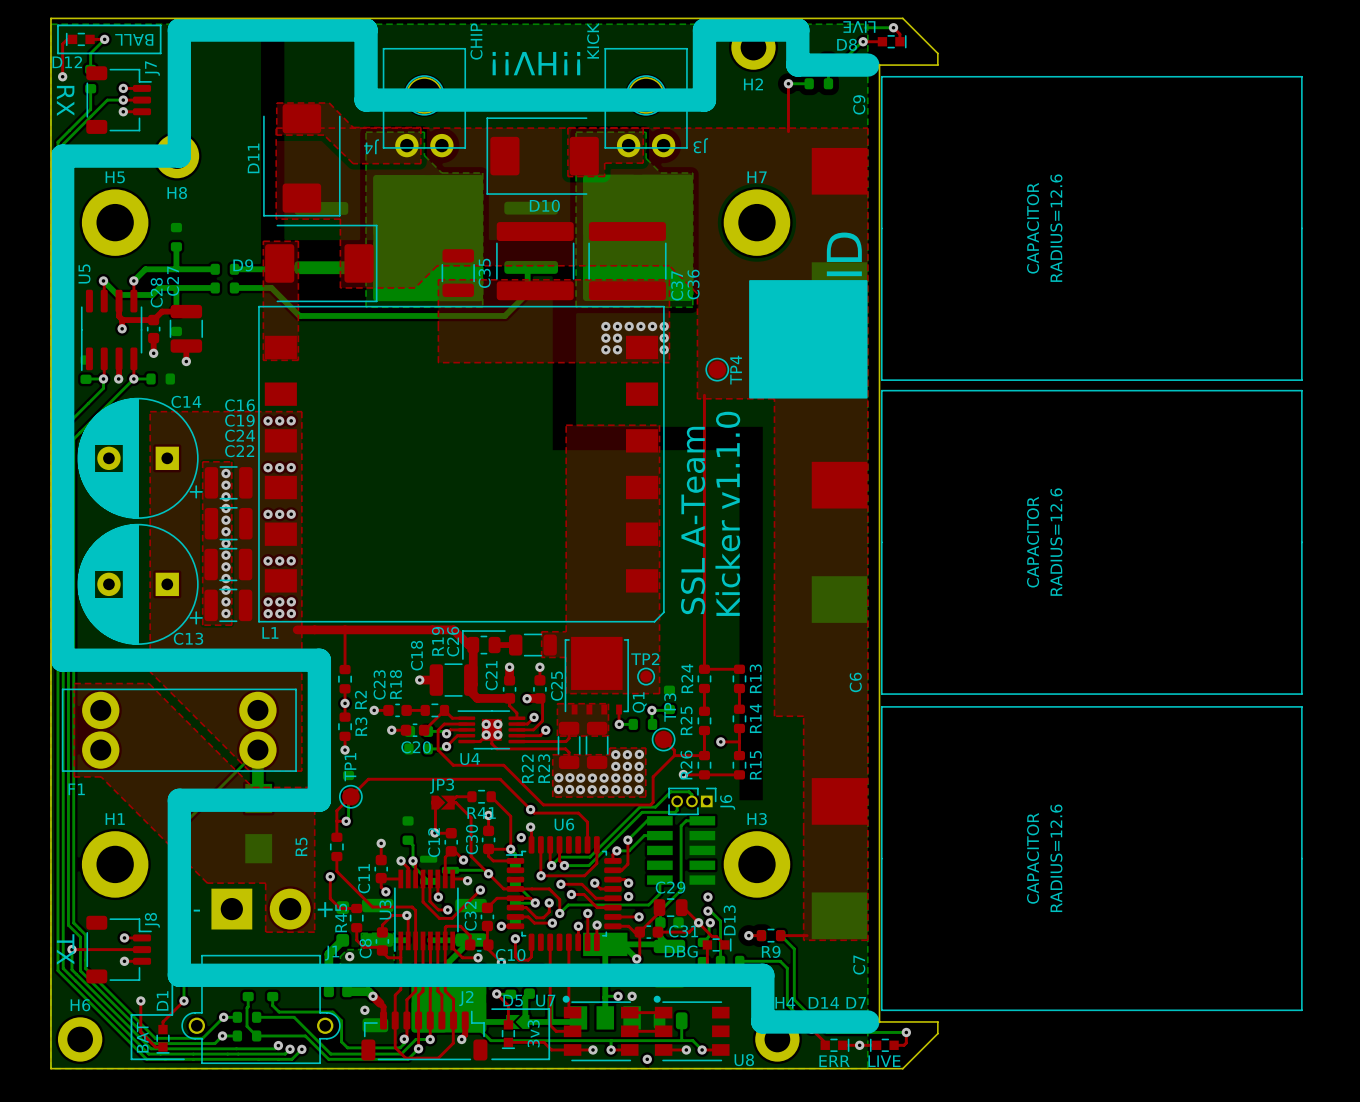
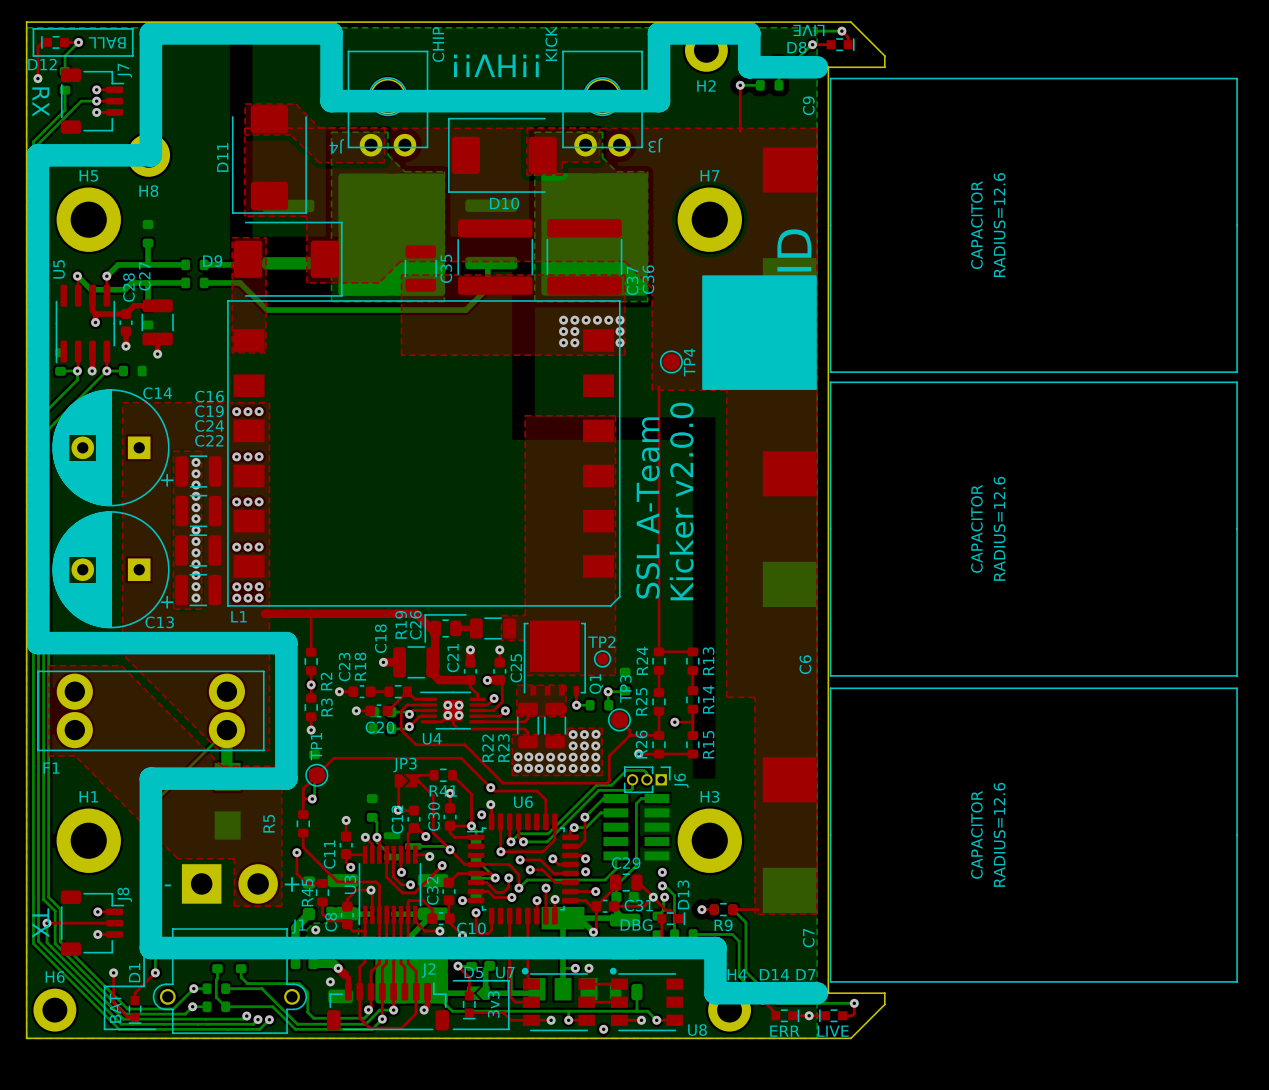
text: Kicker v1.1.0 (727, 513) -> Kicker v2.0.0 (681, 501)

